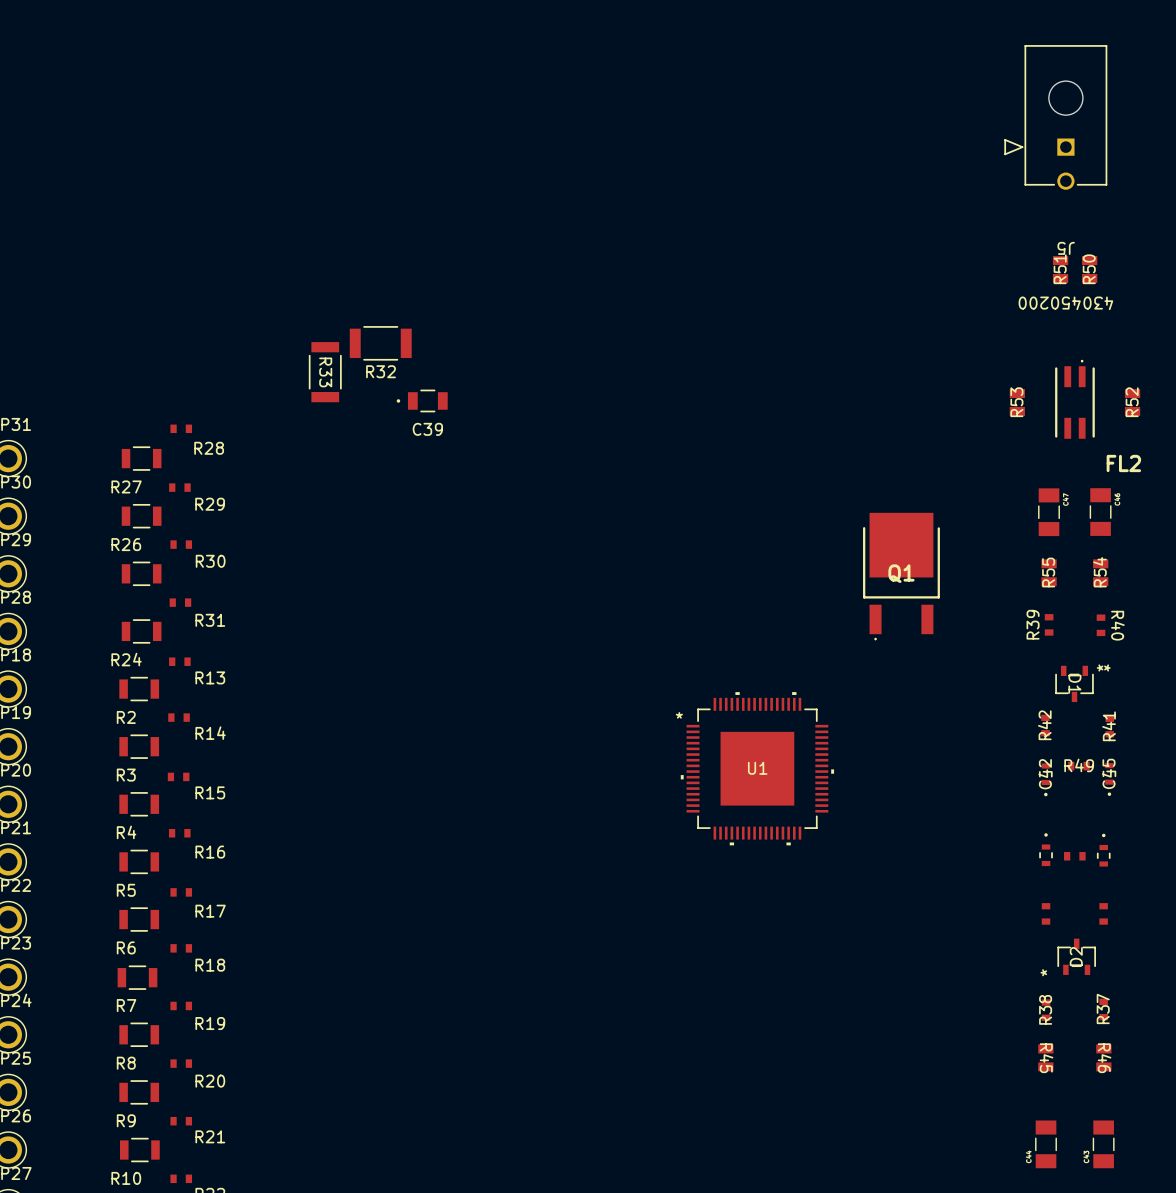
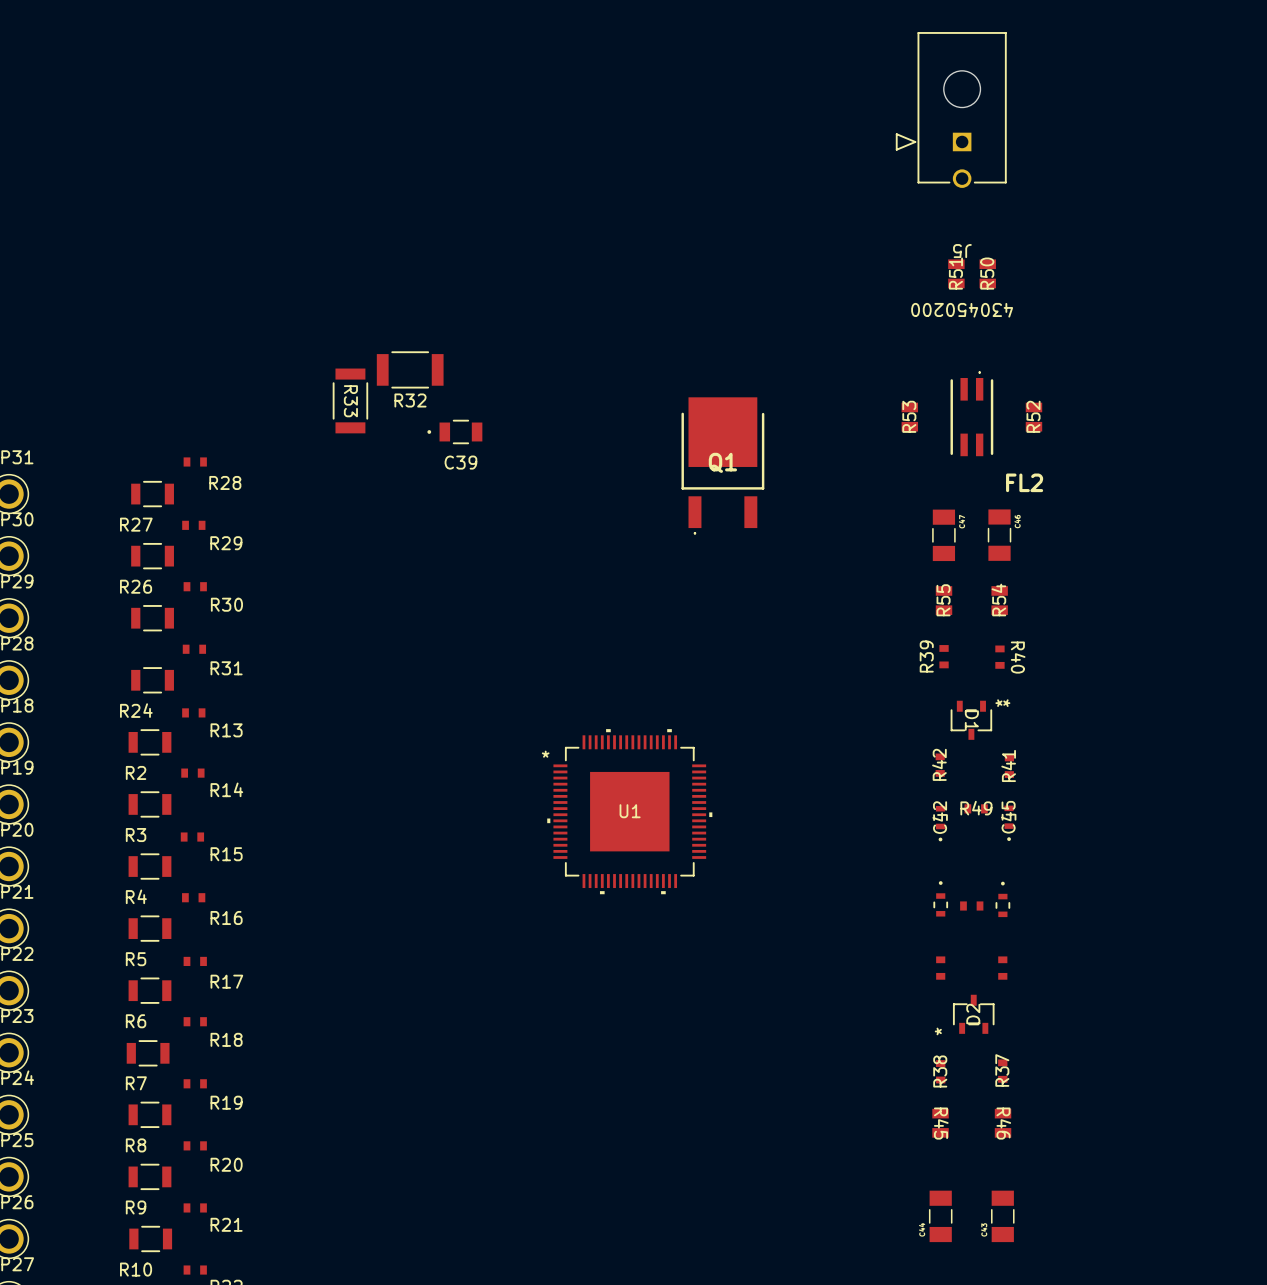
J5 position: (1055, 117) -> (951, 109)
R51 position: (1060, 269) -> (956, 273)
R50 position: (1089, 269) -> (987, 273)
FL2 position: (1074, 399) -> (971, 413)
R53 position: (1017, 402) -> (909, 417)
R52 position: (1132, 402) -> (1033, 417)
part position: (1049, 512) -> (943, 535)
part position: (1100, 512) -> (999, 535)
R55 position: (1049, 572) -> (944, 600)
R54 position: (1100, 572) -> (999, 600)
Q1 position: (901, 576) -> (722, 465)
R39 position: (1049, 624) -> (944, 656)
R40 position: (1101, 625) -> (999, 657)
D1 position: (1074, 683) -> (971, 720)
R42 position: (1045, 725) -> (940, 765)
R41 position: (1109, 726) -> (1009, 766)
R49 position: (1078, 766) -> (976, 808)
U1 position: (757, 768) -> (629, 811)
C42 position: (1045, 779) -> (940, 823)
C45 position: (1109, 779) -> (1009, 823)
part: none -> (940, 898)
part: none -> (1002, 899)
part: none -> (971, 905)
part: (1046, 849) -> none
part: (1103, 850) -> none
part: (1074, 856) -> none
part: none -> (940, 968)
part: none -> (1002, 968)
part: (1046, 913) -> none
part: (1103, 913) -> none
D2 position: (1076, 956) -> (973, 1014)
R37 position: (1103, 1009) -> (1002, 1071)
R38 position: (1046, 1010) -> (940, 1071)
R45 position: (1045, 1057) -> (940, 1123)
R46 position: (1103, 1057) -> (1003, 1123)
part position: (1046, 1144) -> (940, 1216)
part position: (1103, 1144) -> (1002, 1216)

